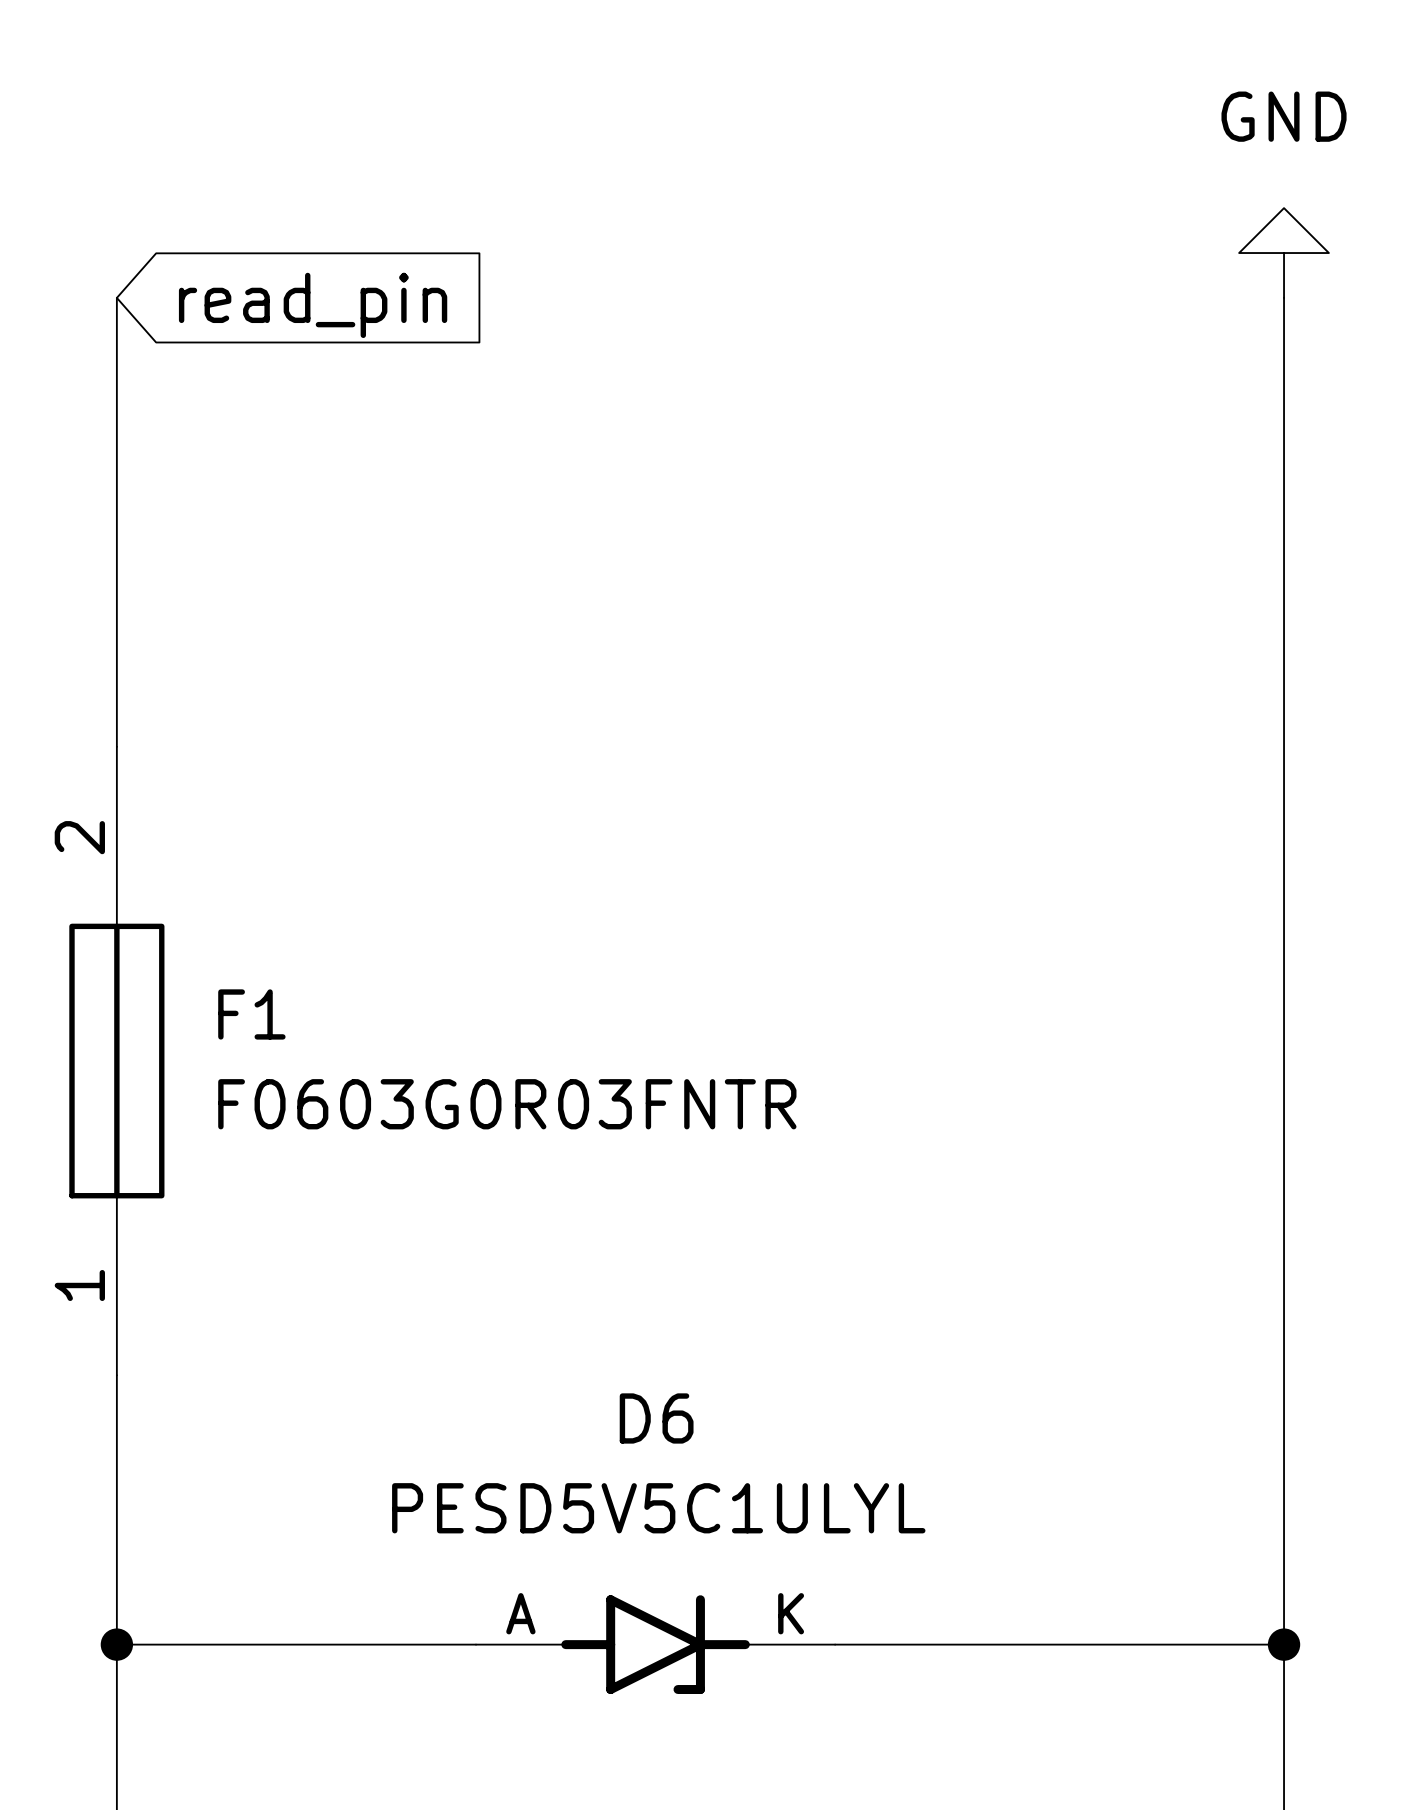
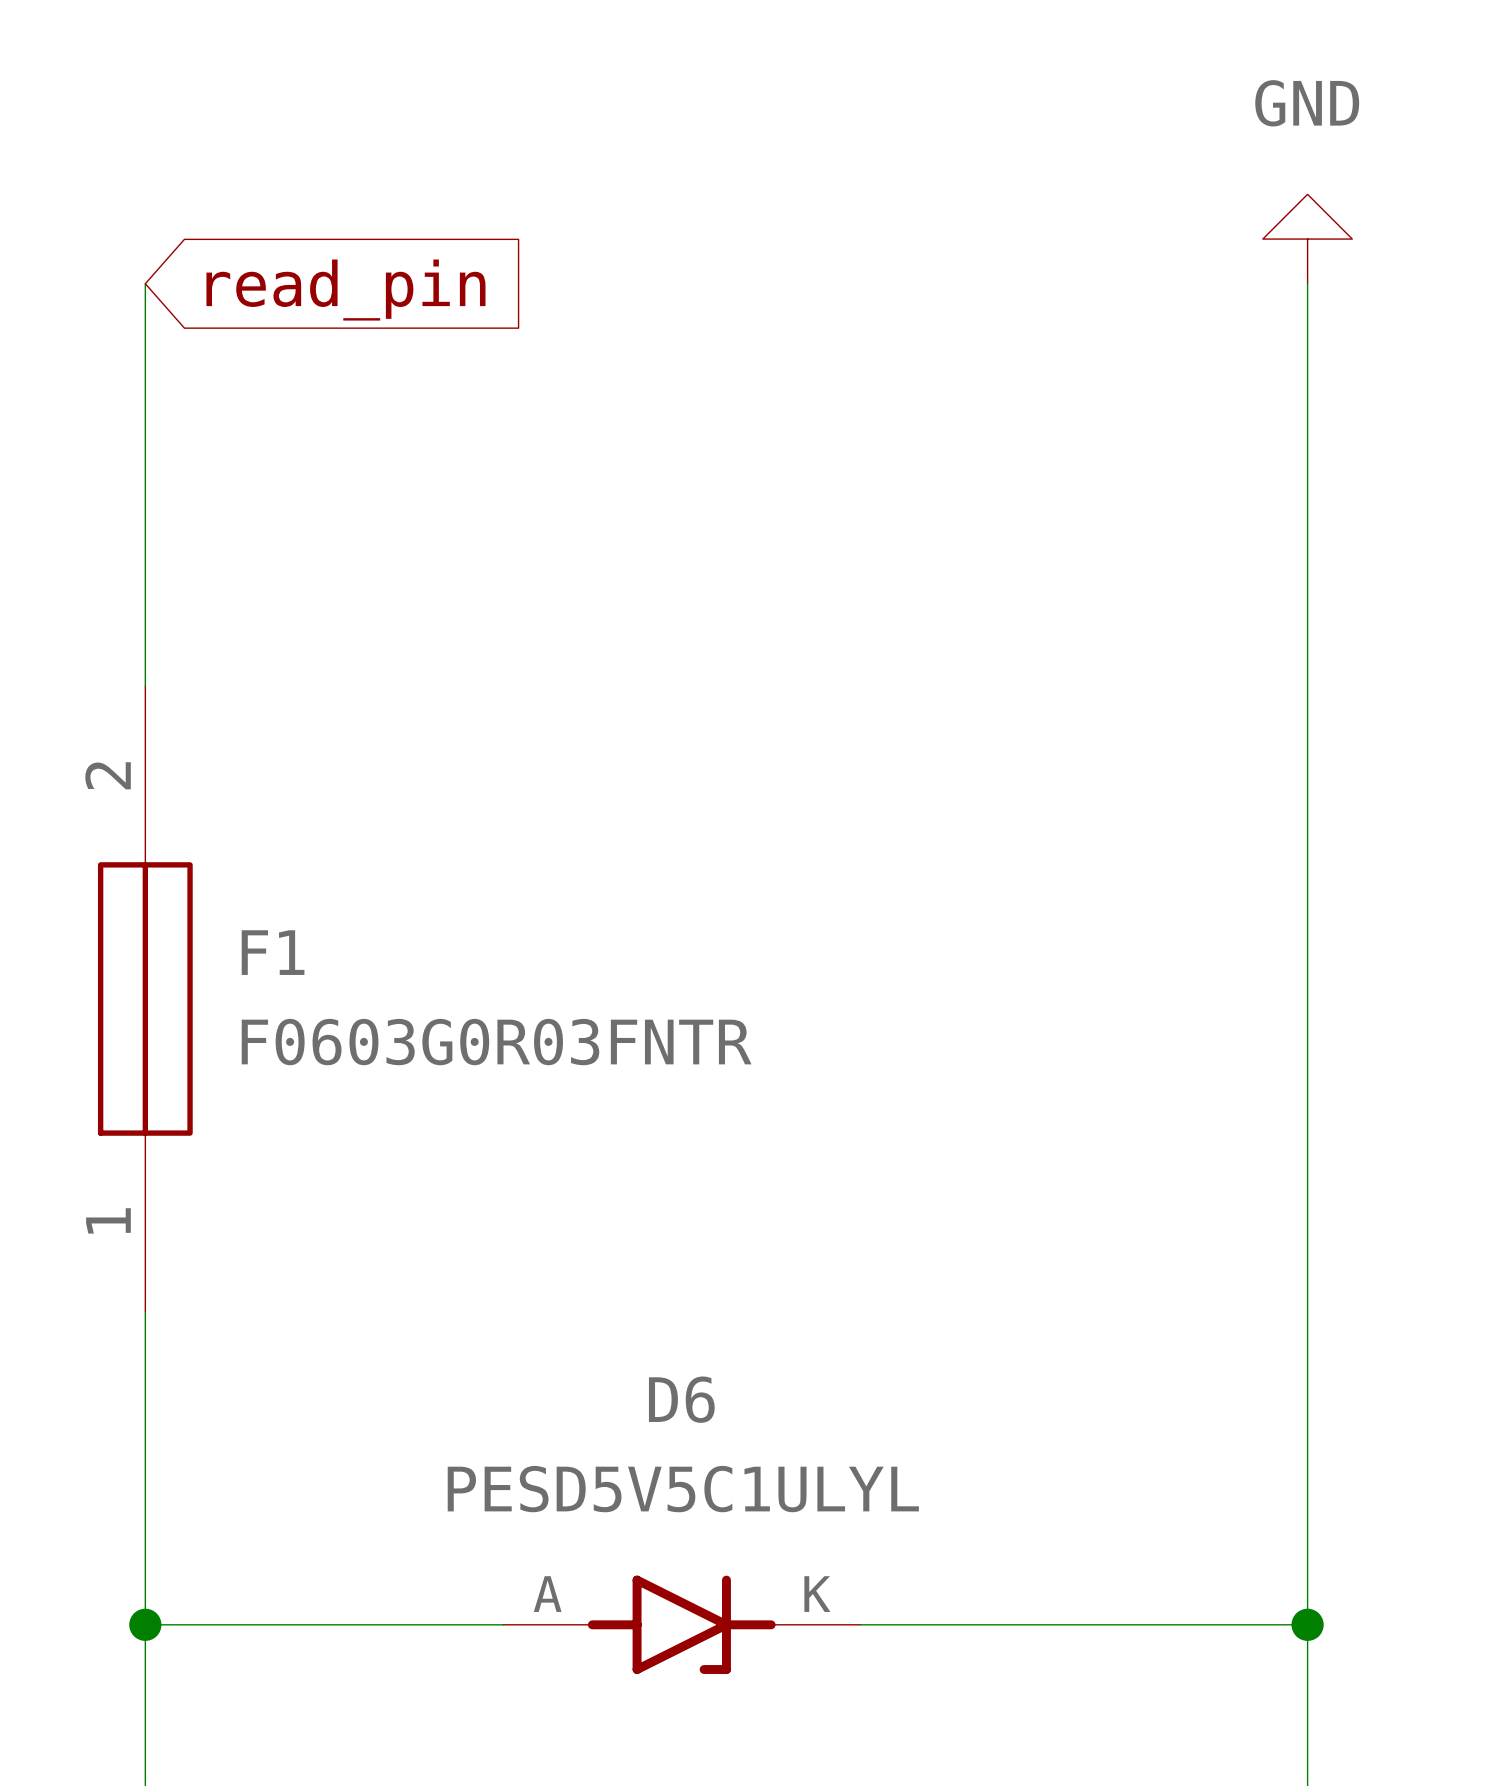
F1 position: (116, 1061) -> (145, 998)

